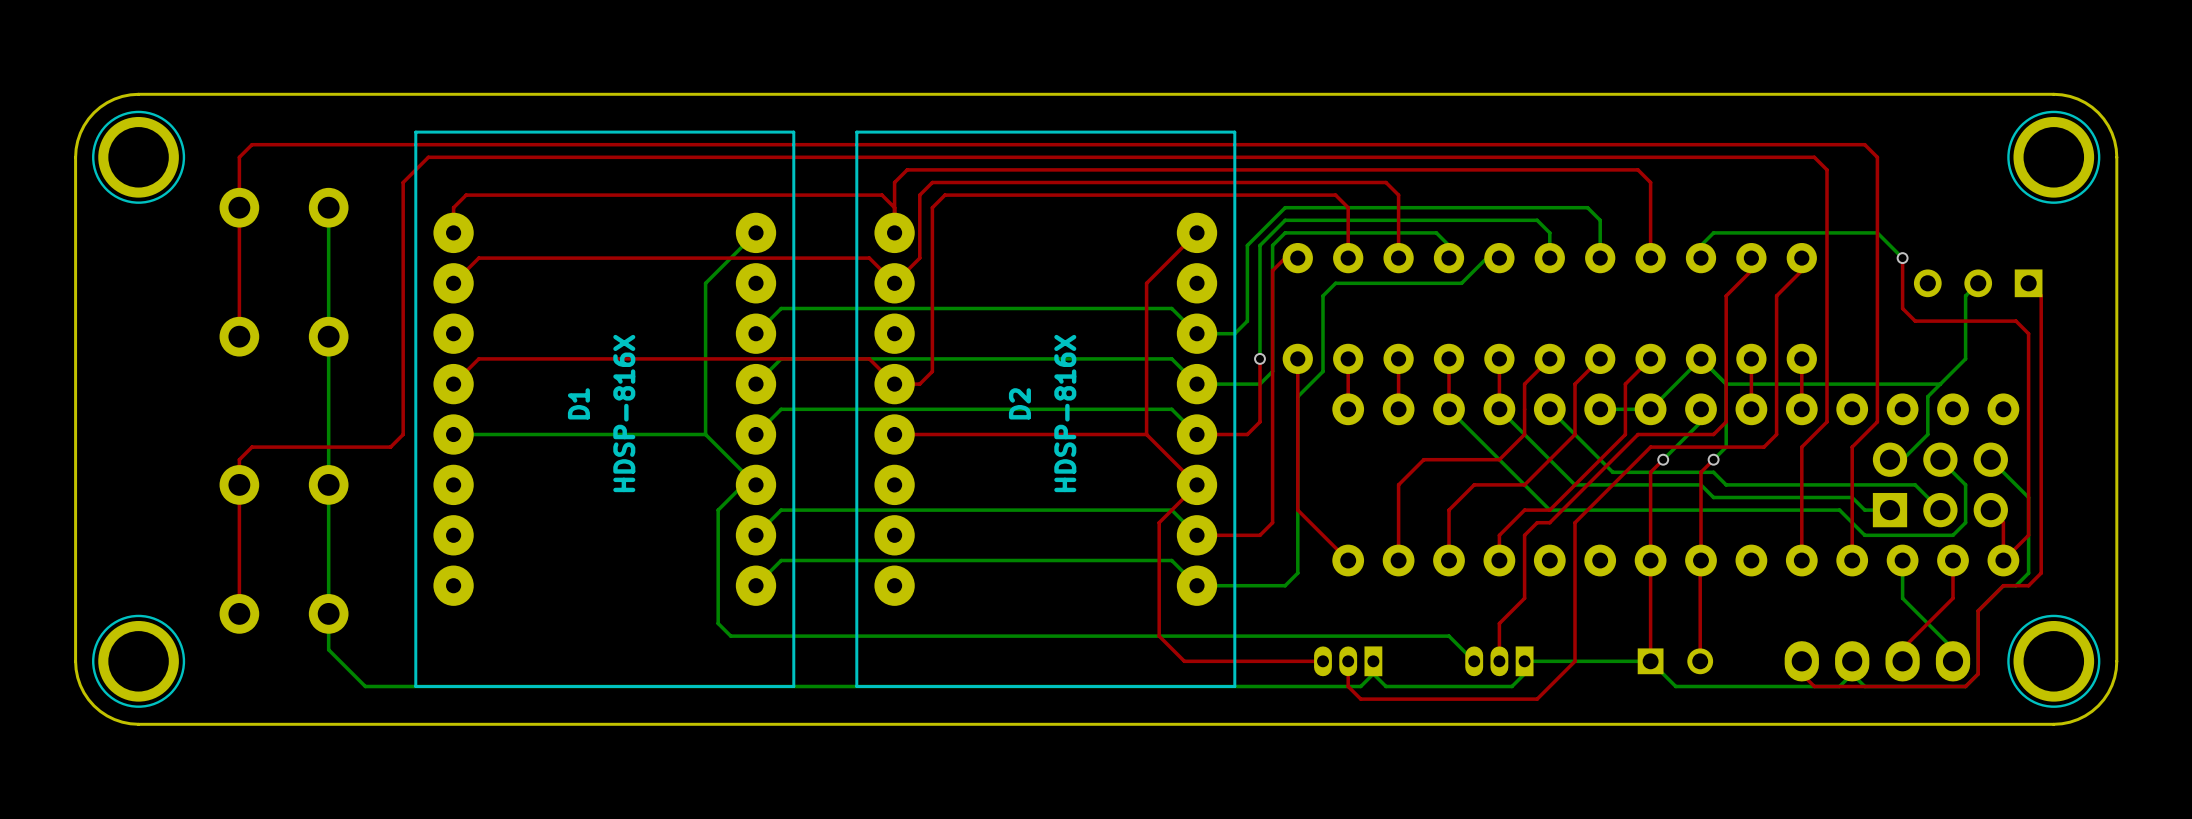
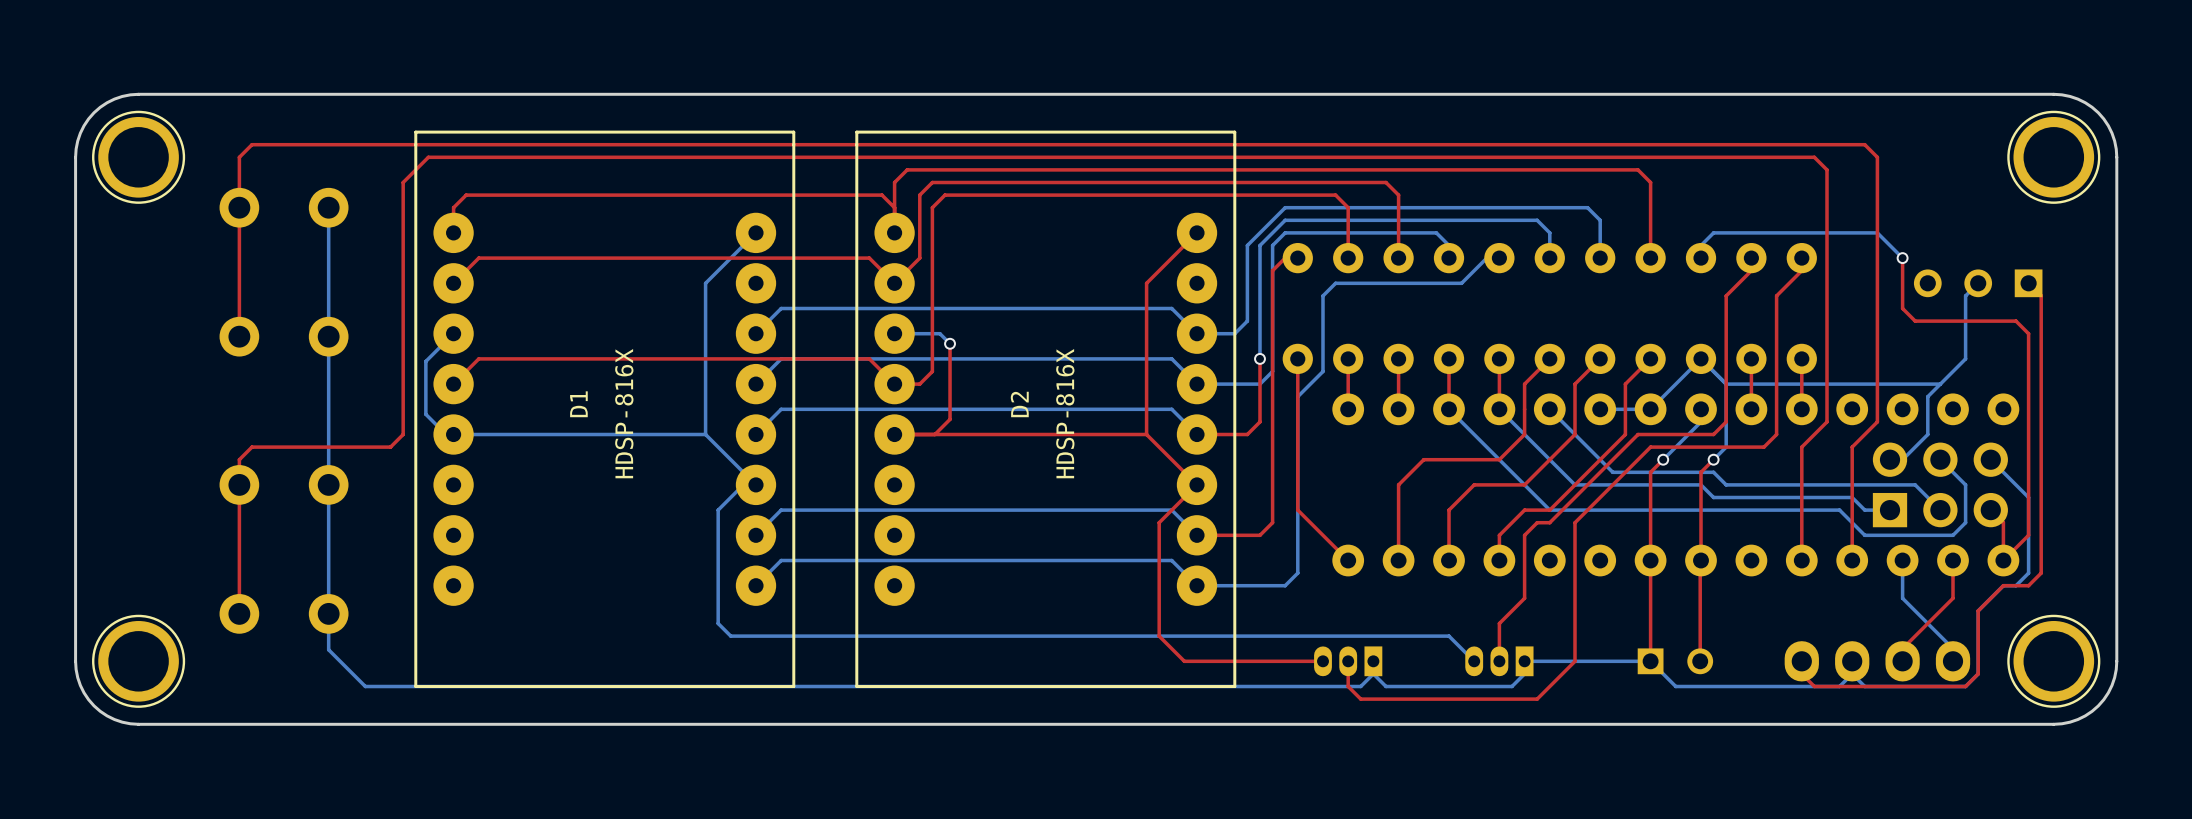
bottom track: none -> (453, 333) (425, 361) (425, 414) (446, 434) (453, 434)
bottom track: none -> (894, 333) (939, 333) (950, 343)
top track: none -> (950, 343) (950, 419) (934, 434)
via: none -> (950, 343)

